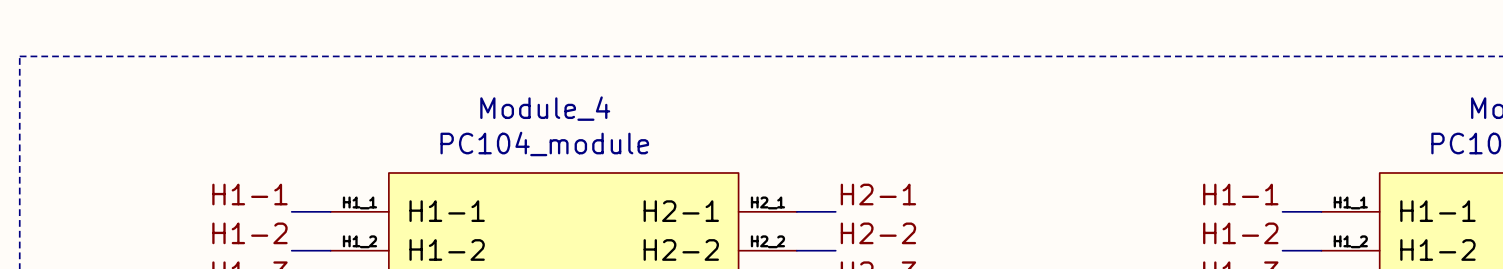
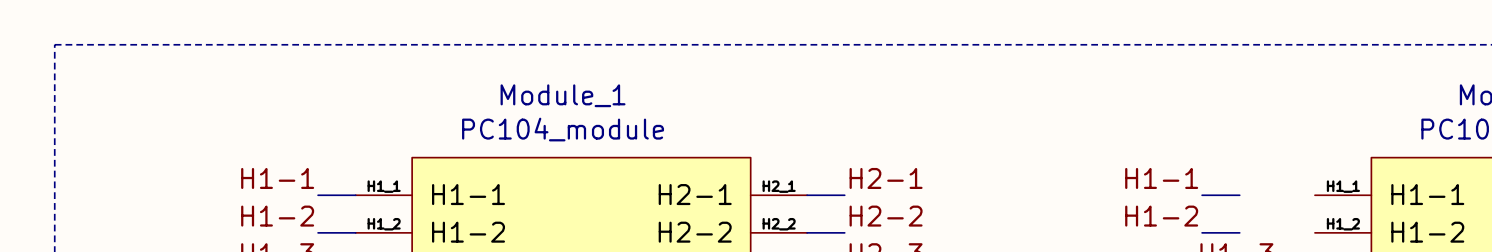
Module_4 name: Module_4 (545, 108) -> Module_1 (563, 95)
label position: H1-1 (1240, 194) -> H1-1 (1161, 178)
wire: (1282, 211) (1321, 211) -> (1202, 195) (1239, 195)
label position: H1-2 (1240, 233) -> H1-2 (1161, 216)
wire: (1282, 250) (1321, 250) -> (1202, 232) (1239, 232)

